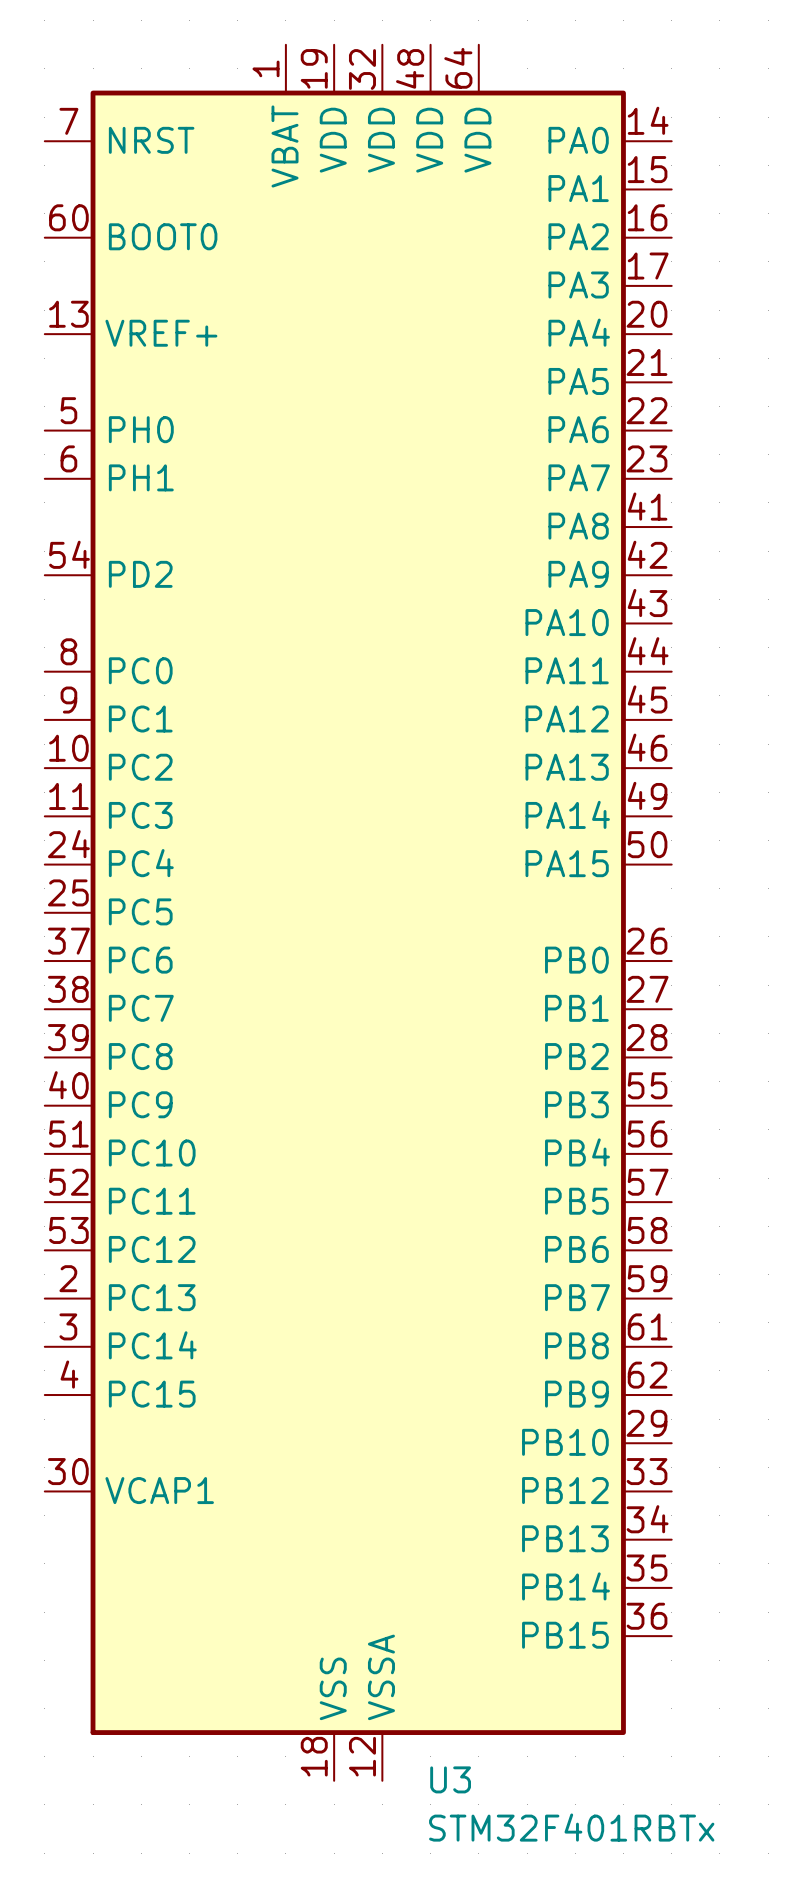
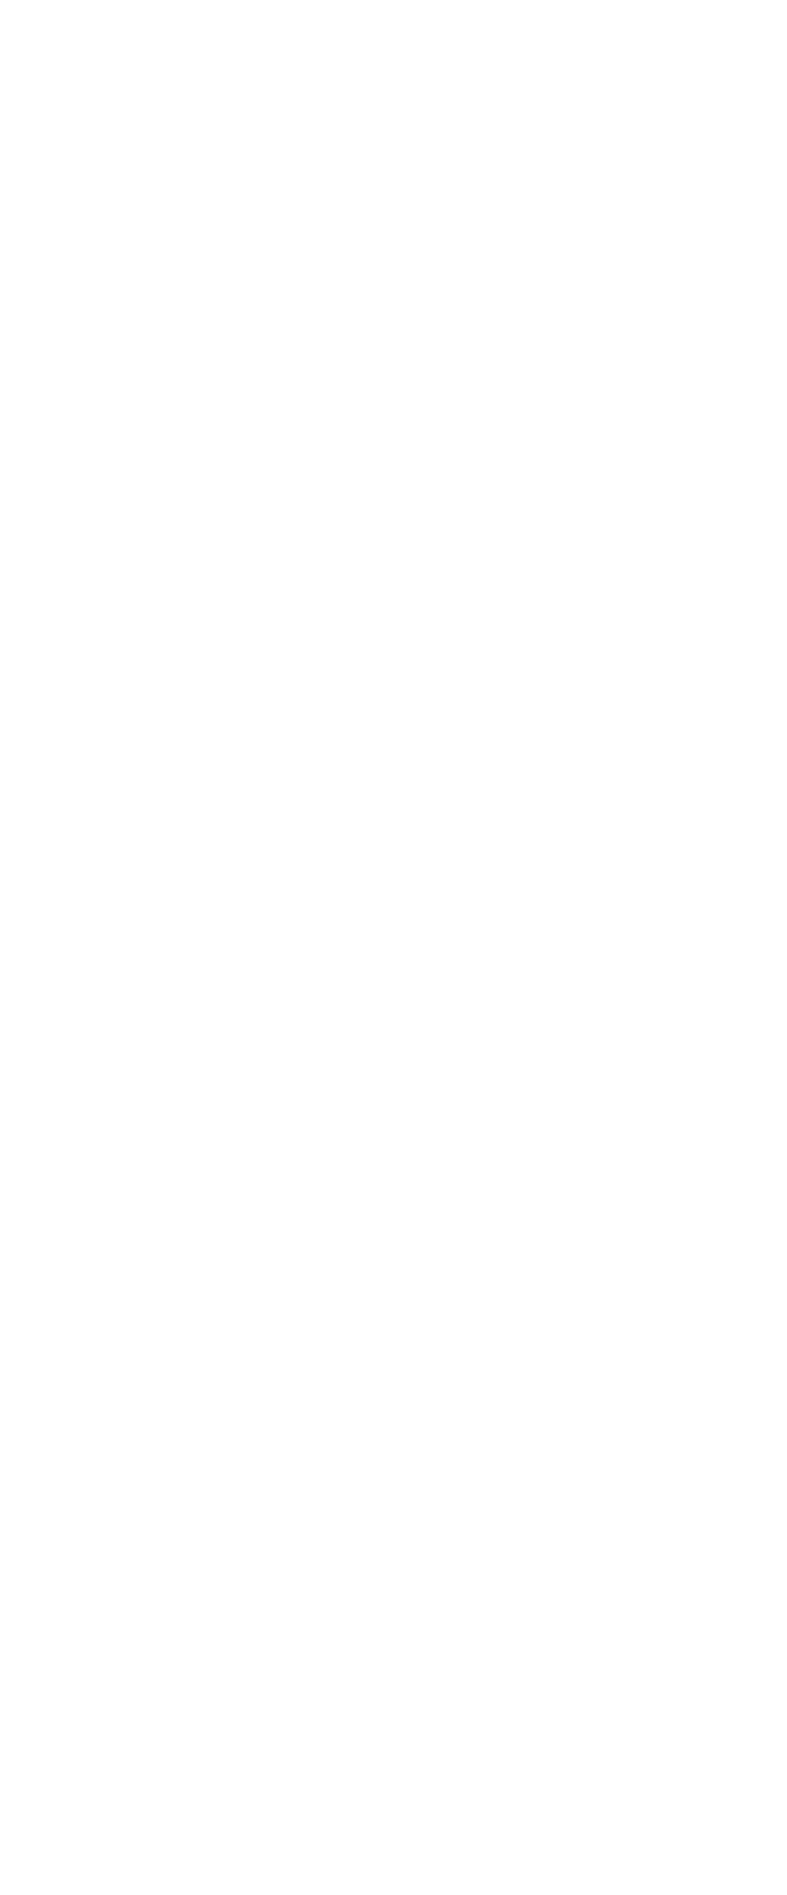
U3: STM32F401RBTx (358, 912) -> none

